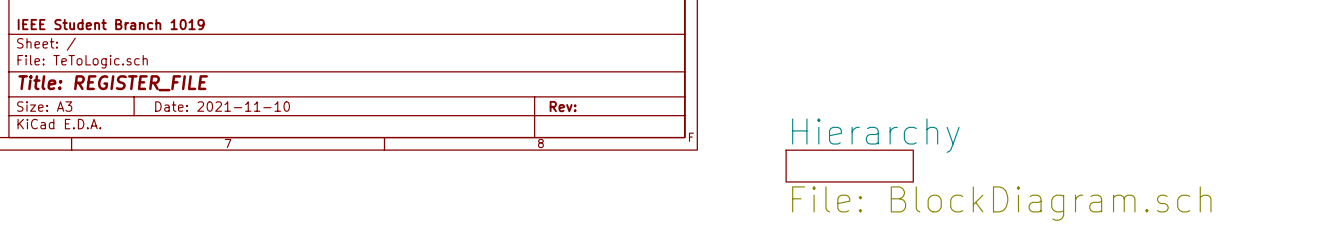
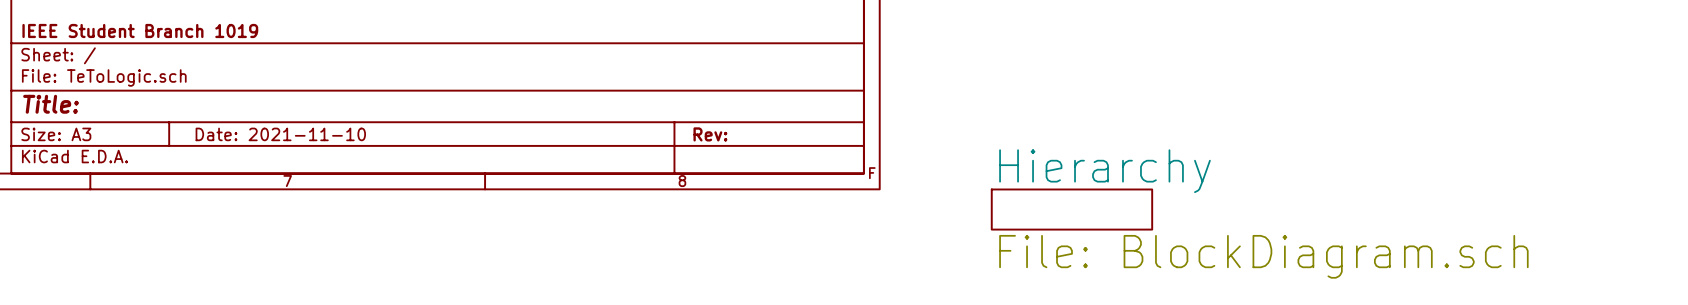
title block: Title: REGISTER_FILE (113, 83) -> Title: (51, 104)

